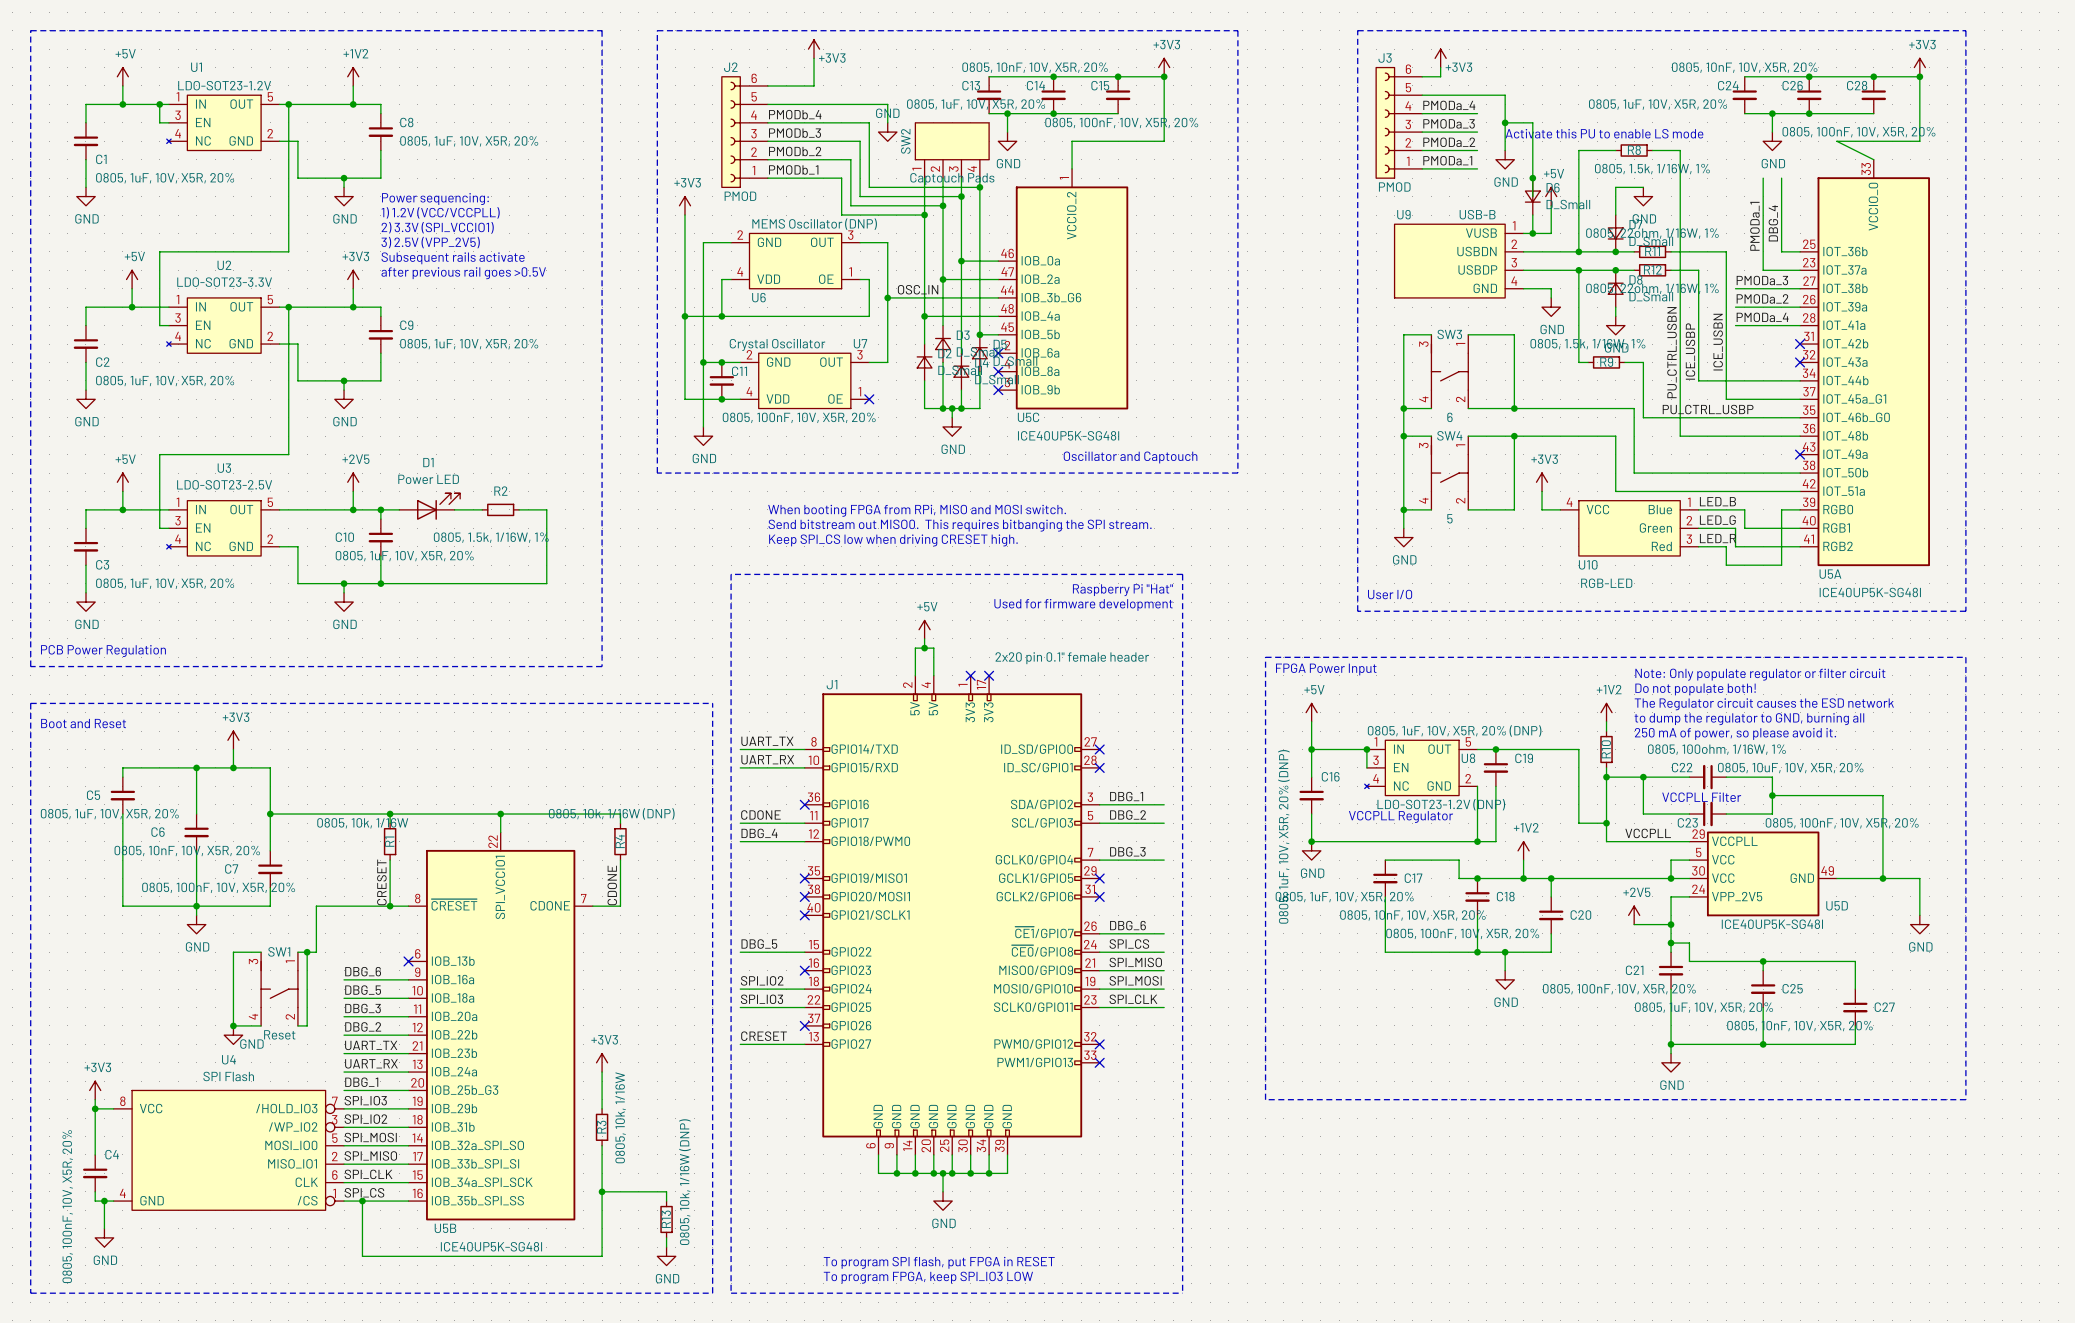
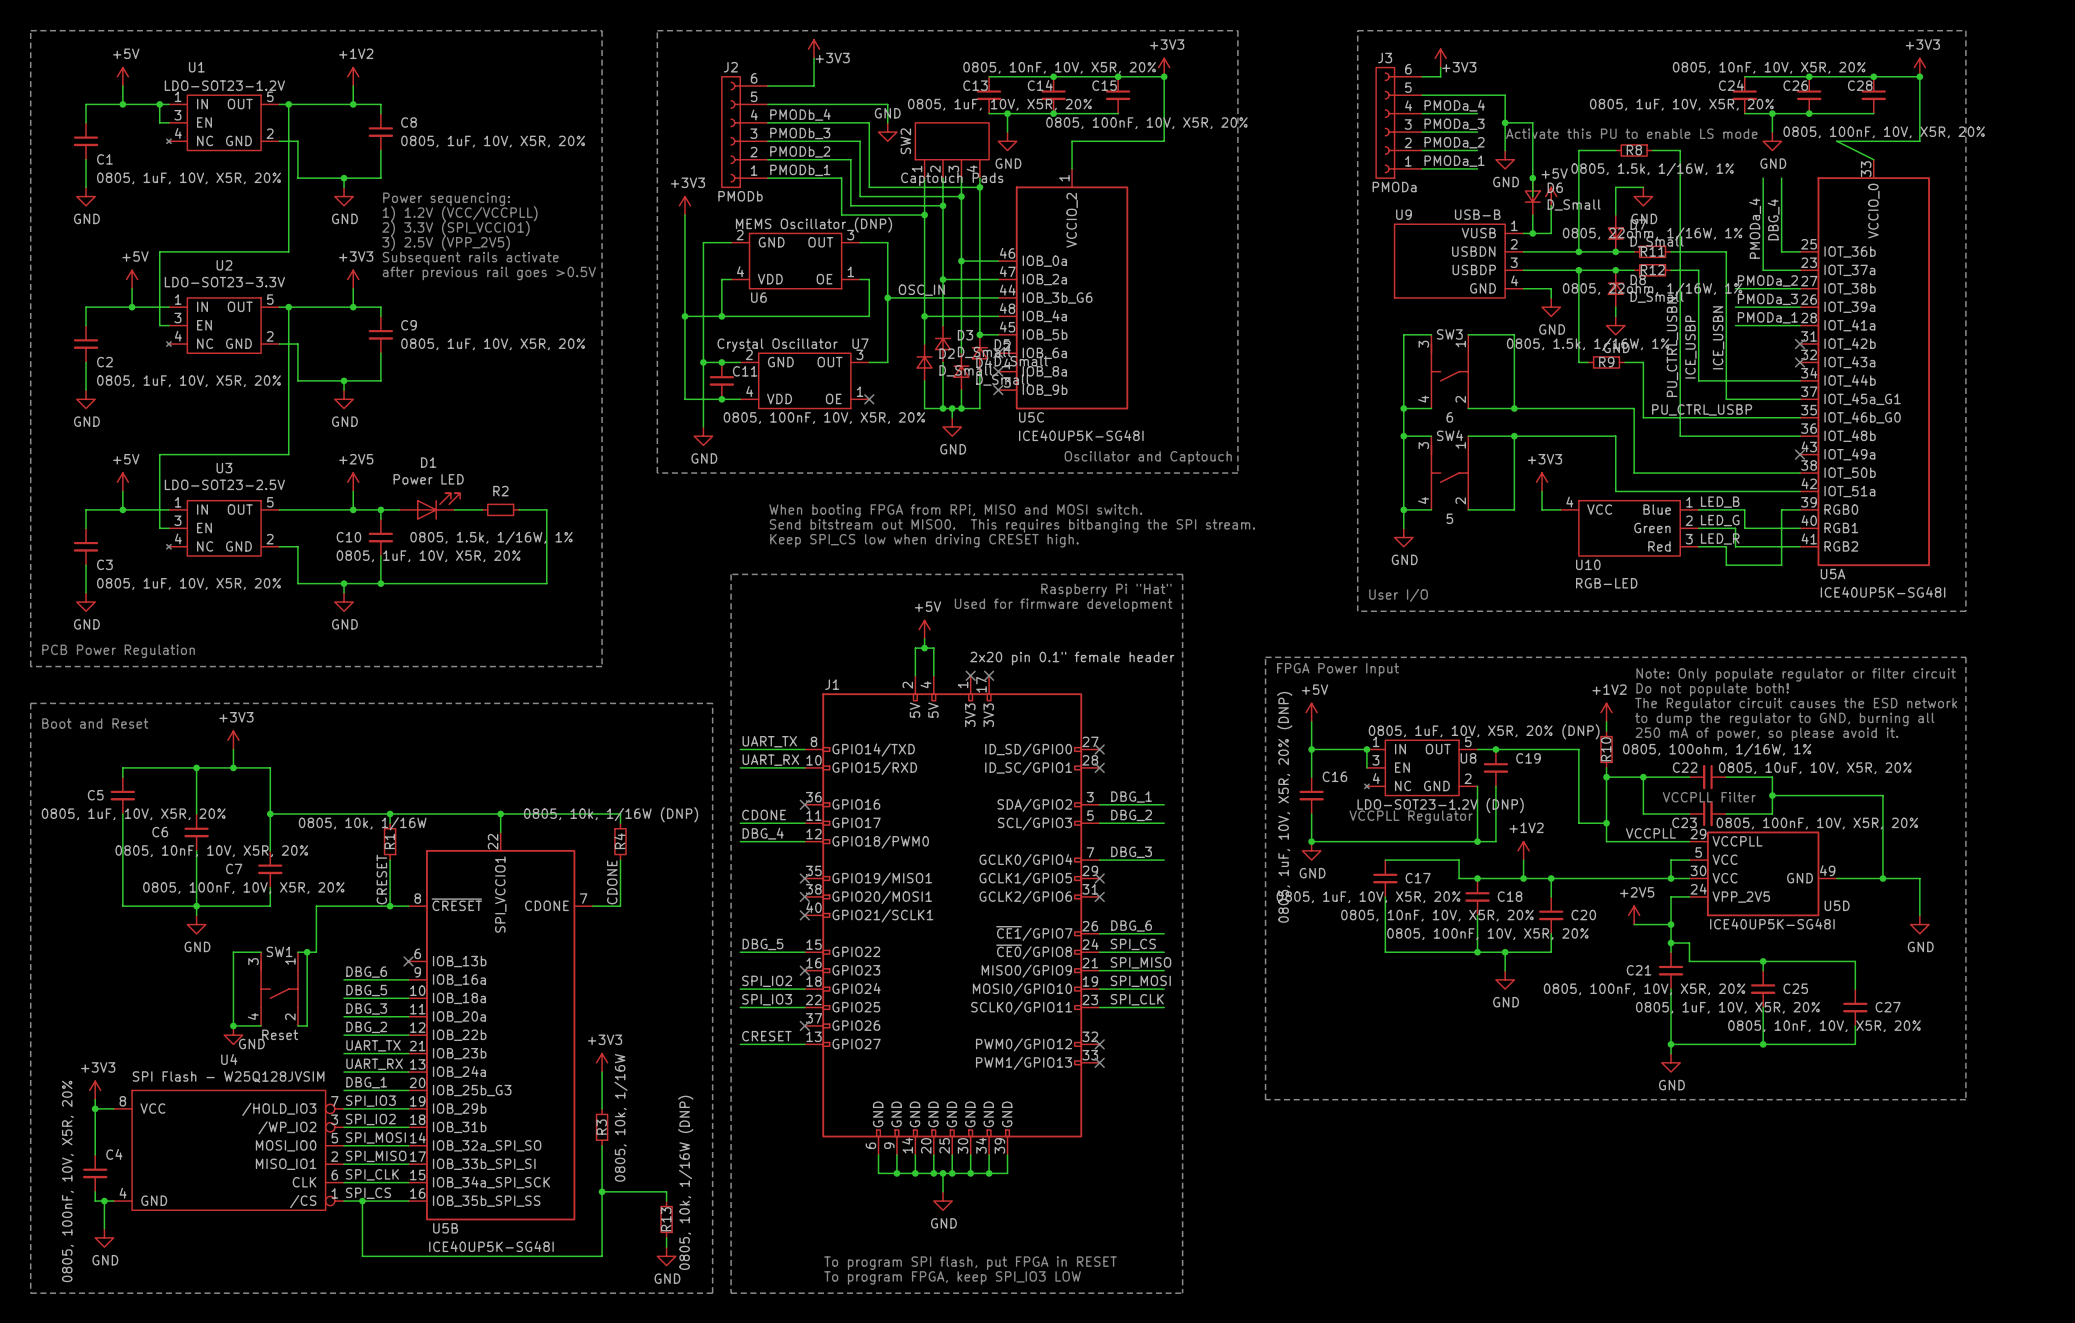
J3 value: PMOD (1394, 187) -> PMODa (1394, 187)
J2 value: PMOD (740, 196) -> PMODb (740, 196)
label: PMODa_1 (1754, 226) -> PMODa_4 (1755, 228)
label: PMODa_3 (1762, 280) -> PMODa_2 (1767, 280)
label: PMODa_2 (1762, 298) -> PMODa_3 (1767, 299)
label: PMODa_4 (1762, 317) -> PMODa_1 (1767, 317)
U4 value: SPI Flash (228, 1076) -> SPI Flash - W25Q128JVSIM (228, 1076)

